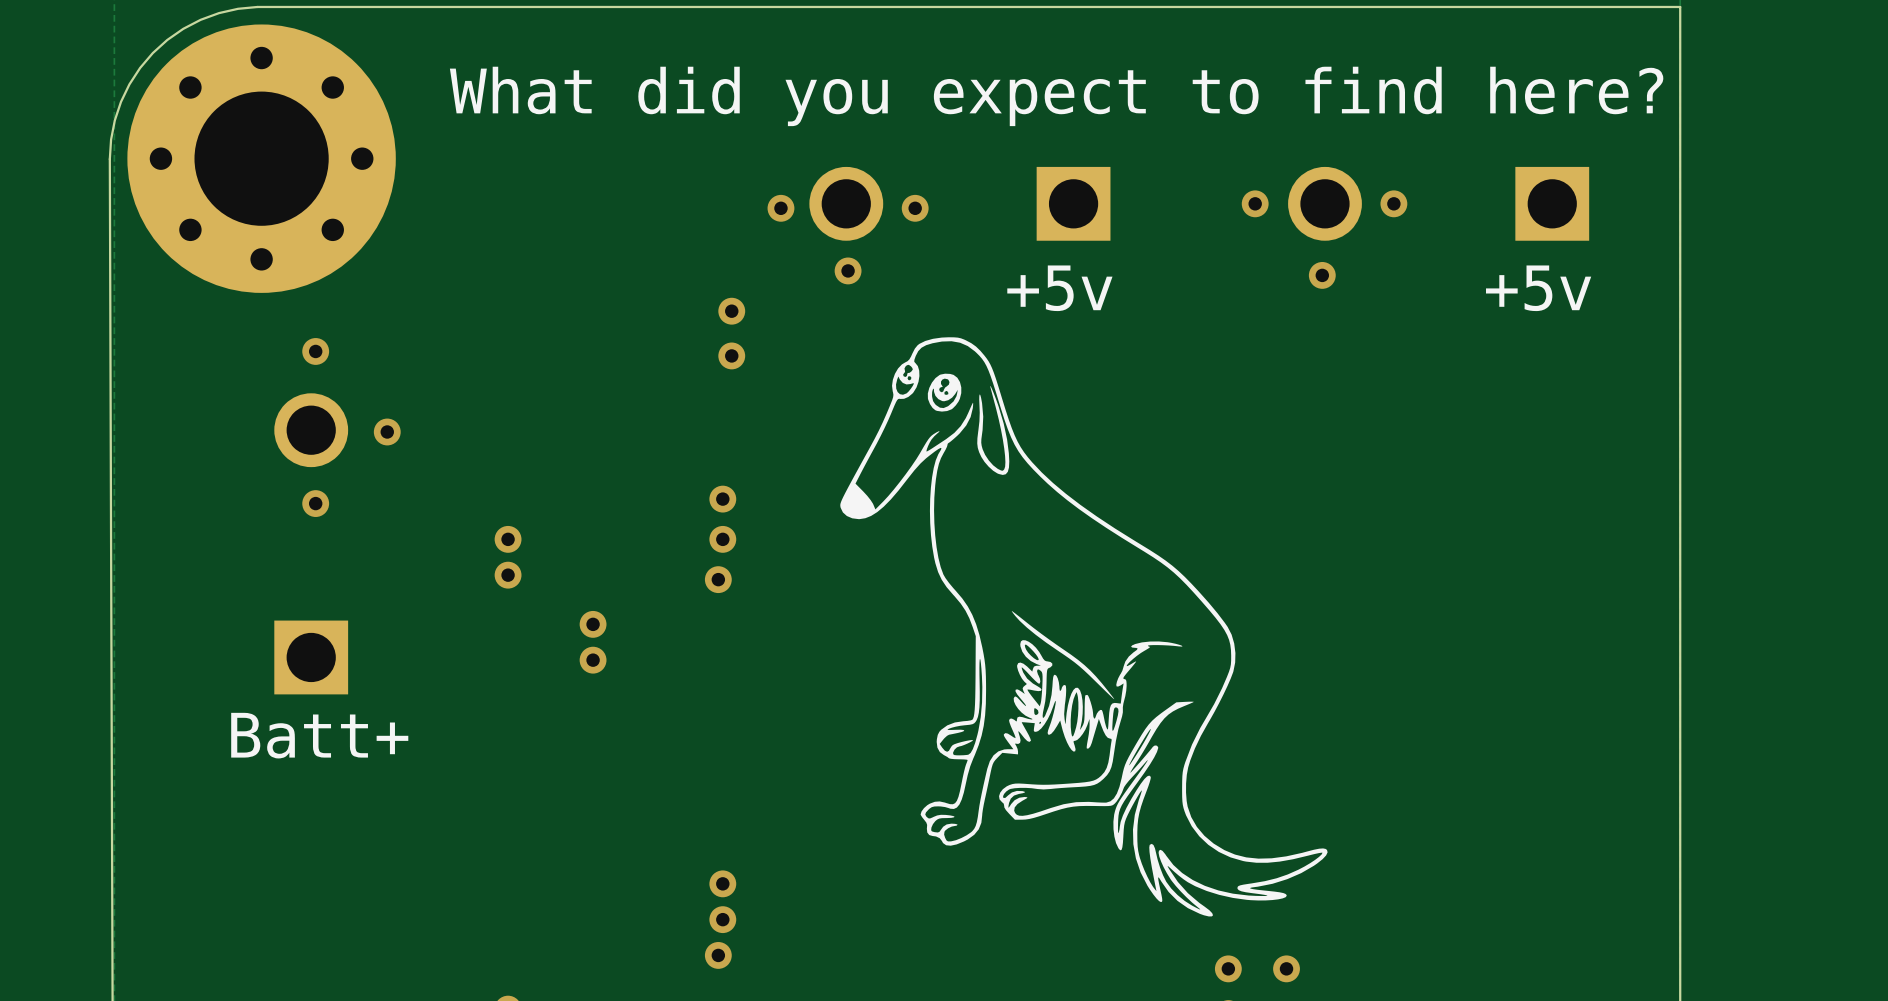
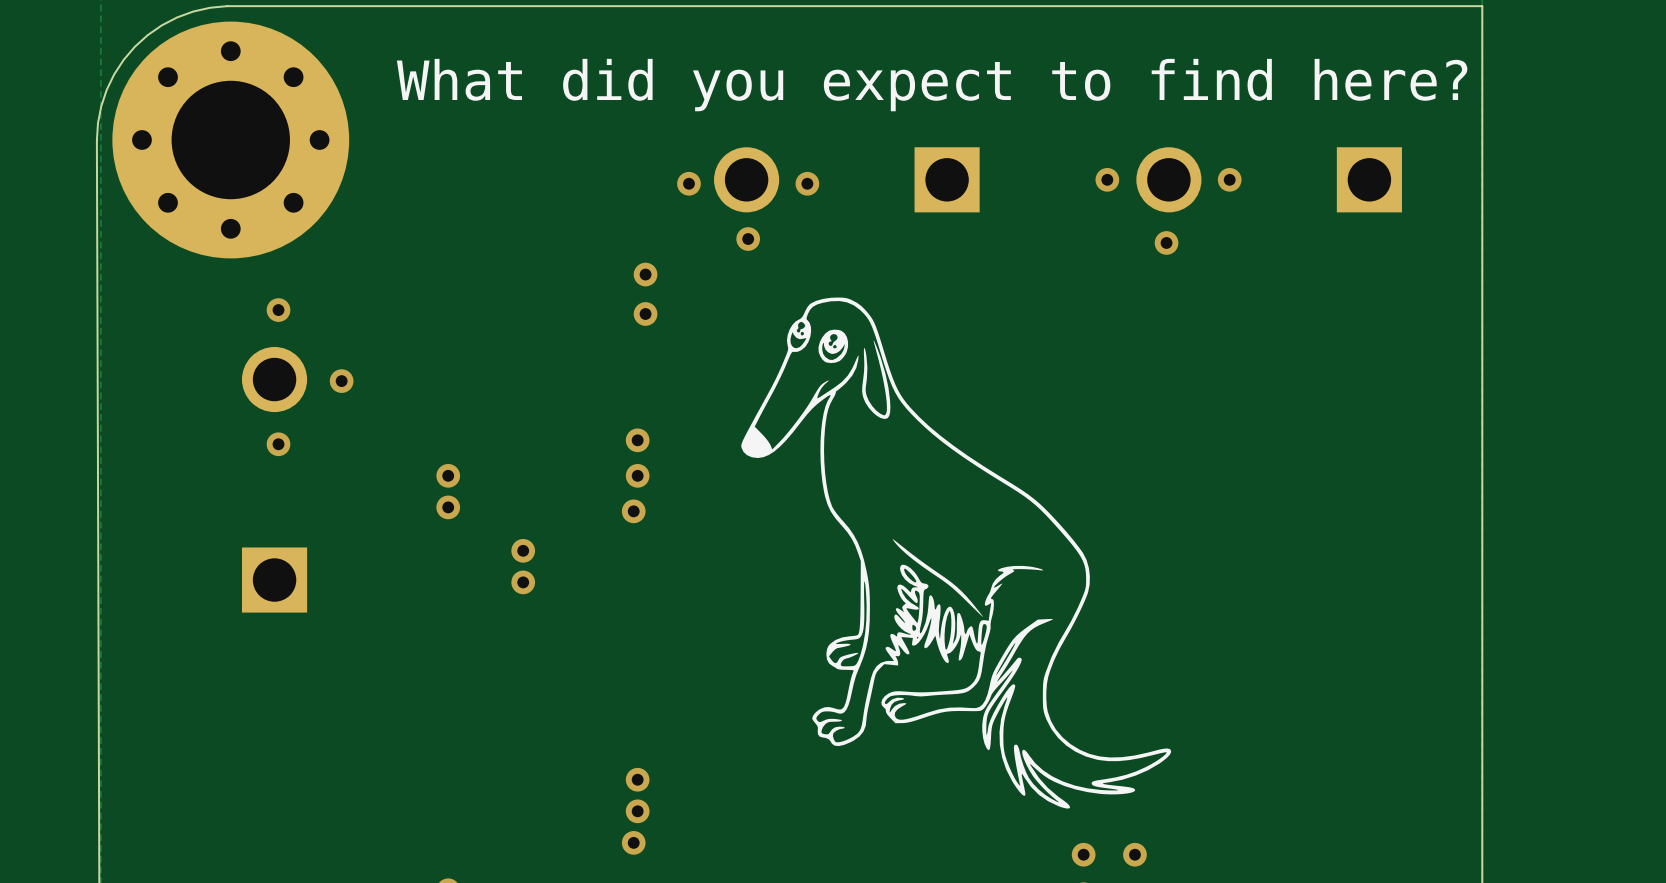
text: +5v (1059, 288) -> none
text: +5v (1538, 288) -> none
text: Batt+ (319, 735) -> none

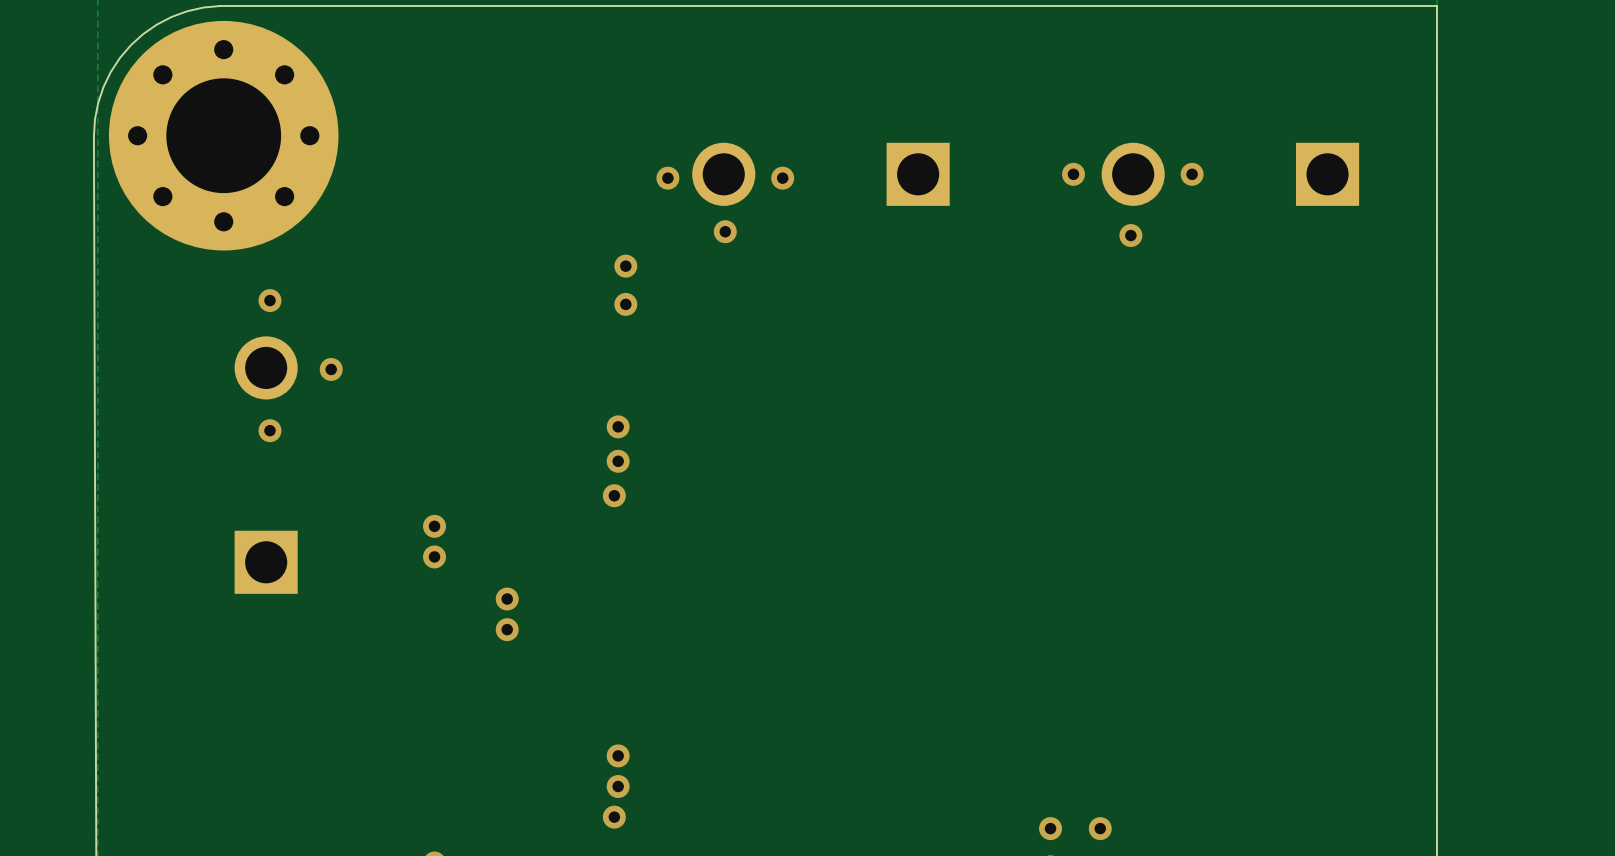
text: What did you expect to find here? (932, 85) -> none
drawing: [741, 297, 1172, 809] -> none
via: (448, 475) -> none
via: (448, 507) -> none
via: none -> (434, 526)
via: (523, 550) -> none
via: none -> (434, 556)
via: (523, 582) -> none
via: none -> (507, 599)
via: none -> (507, 629)

